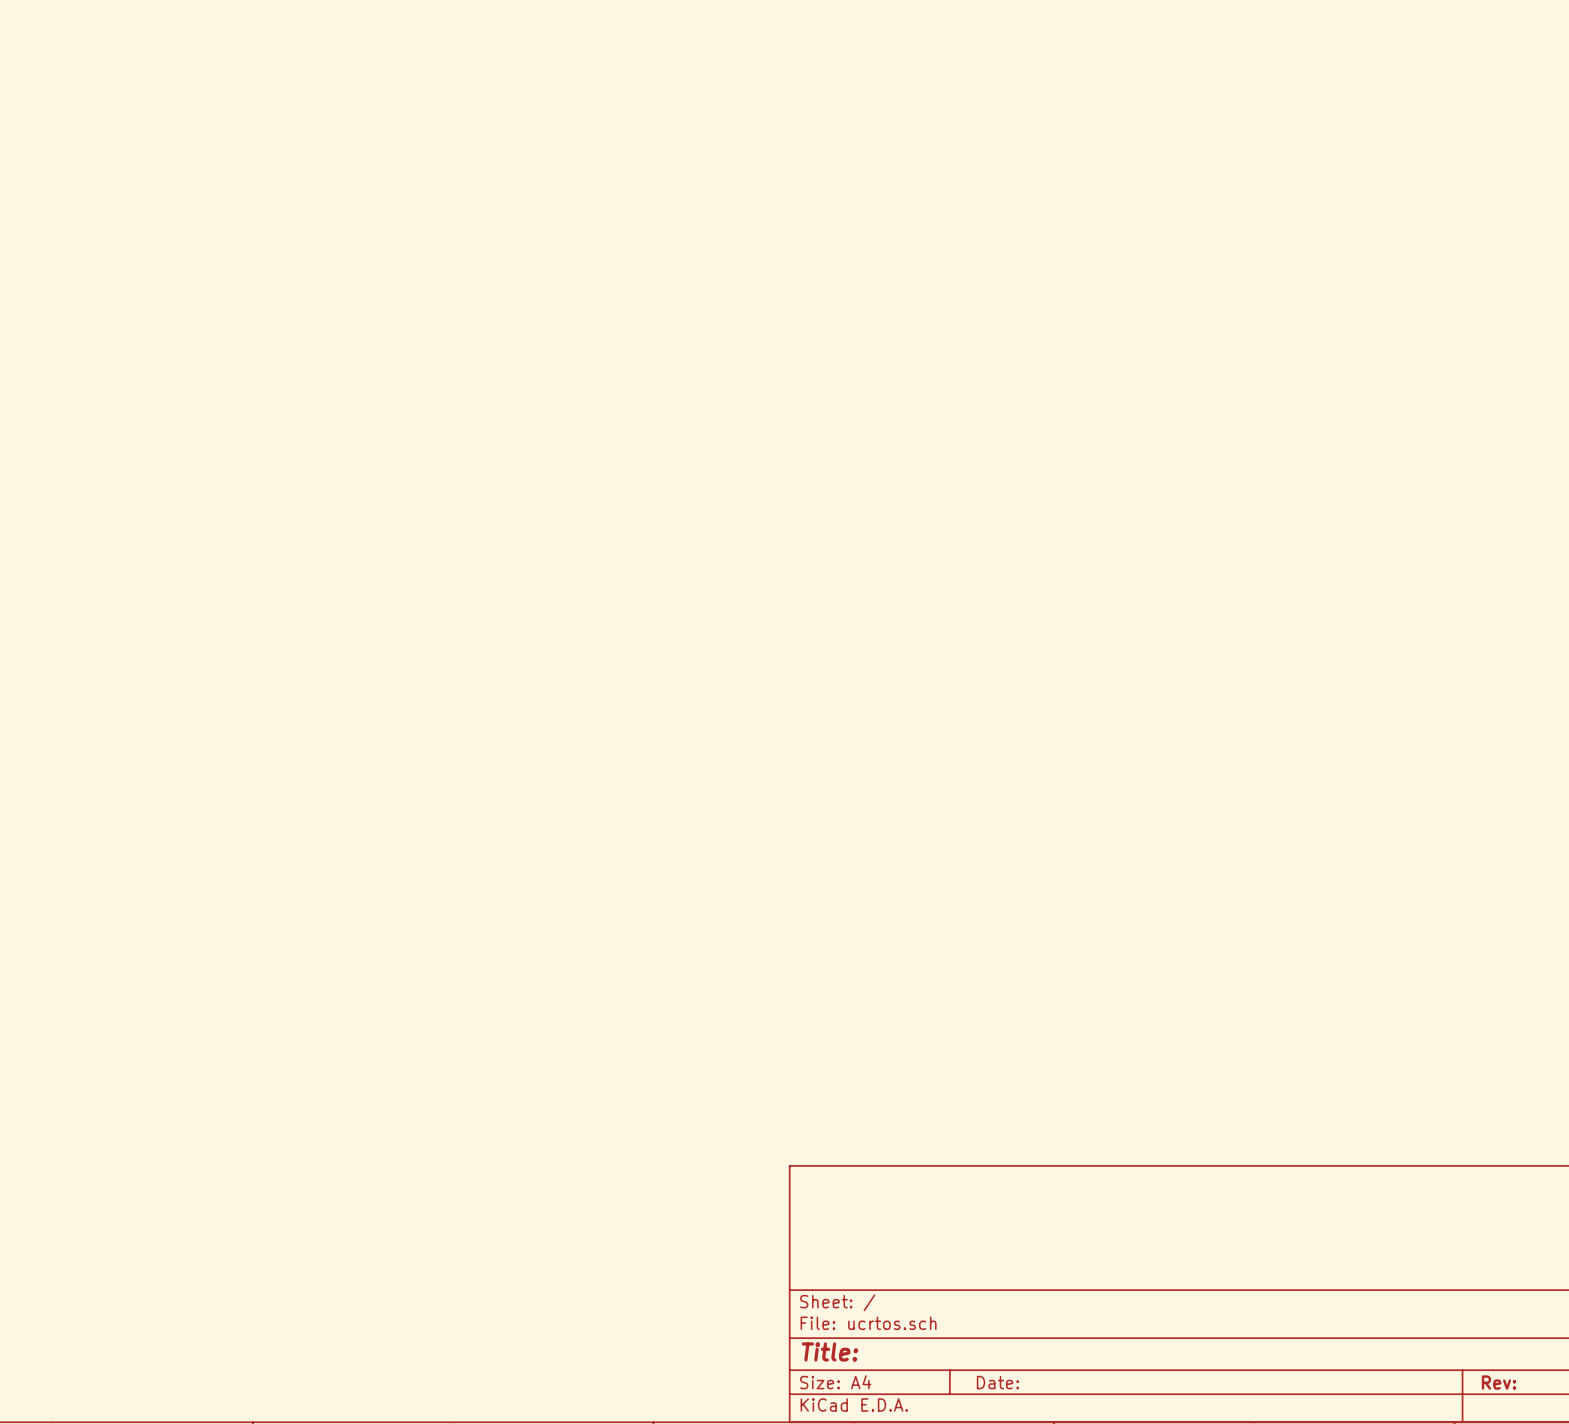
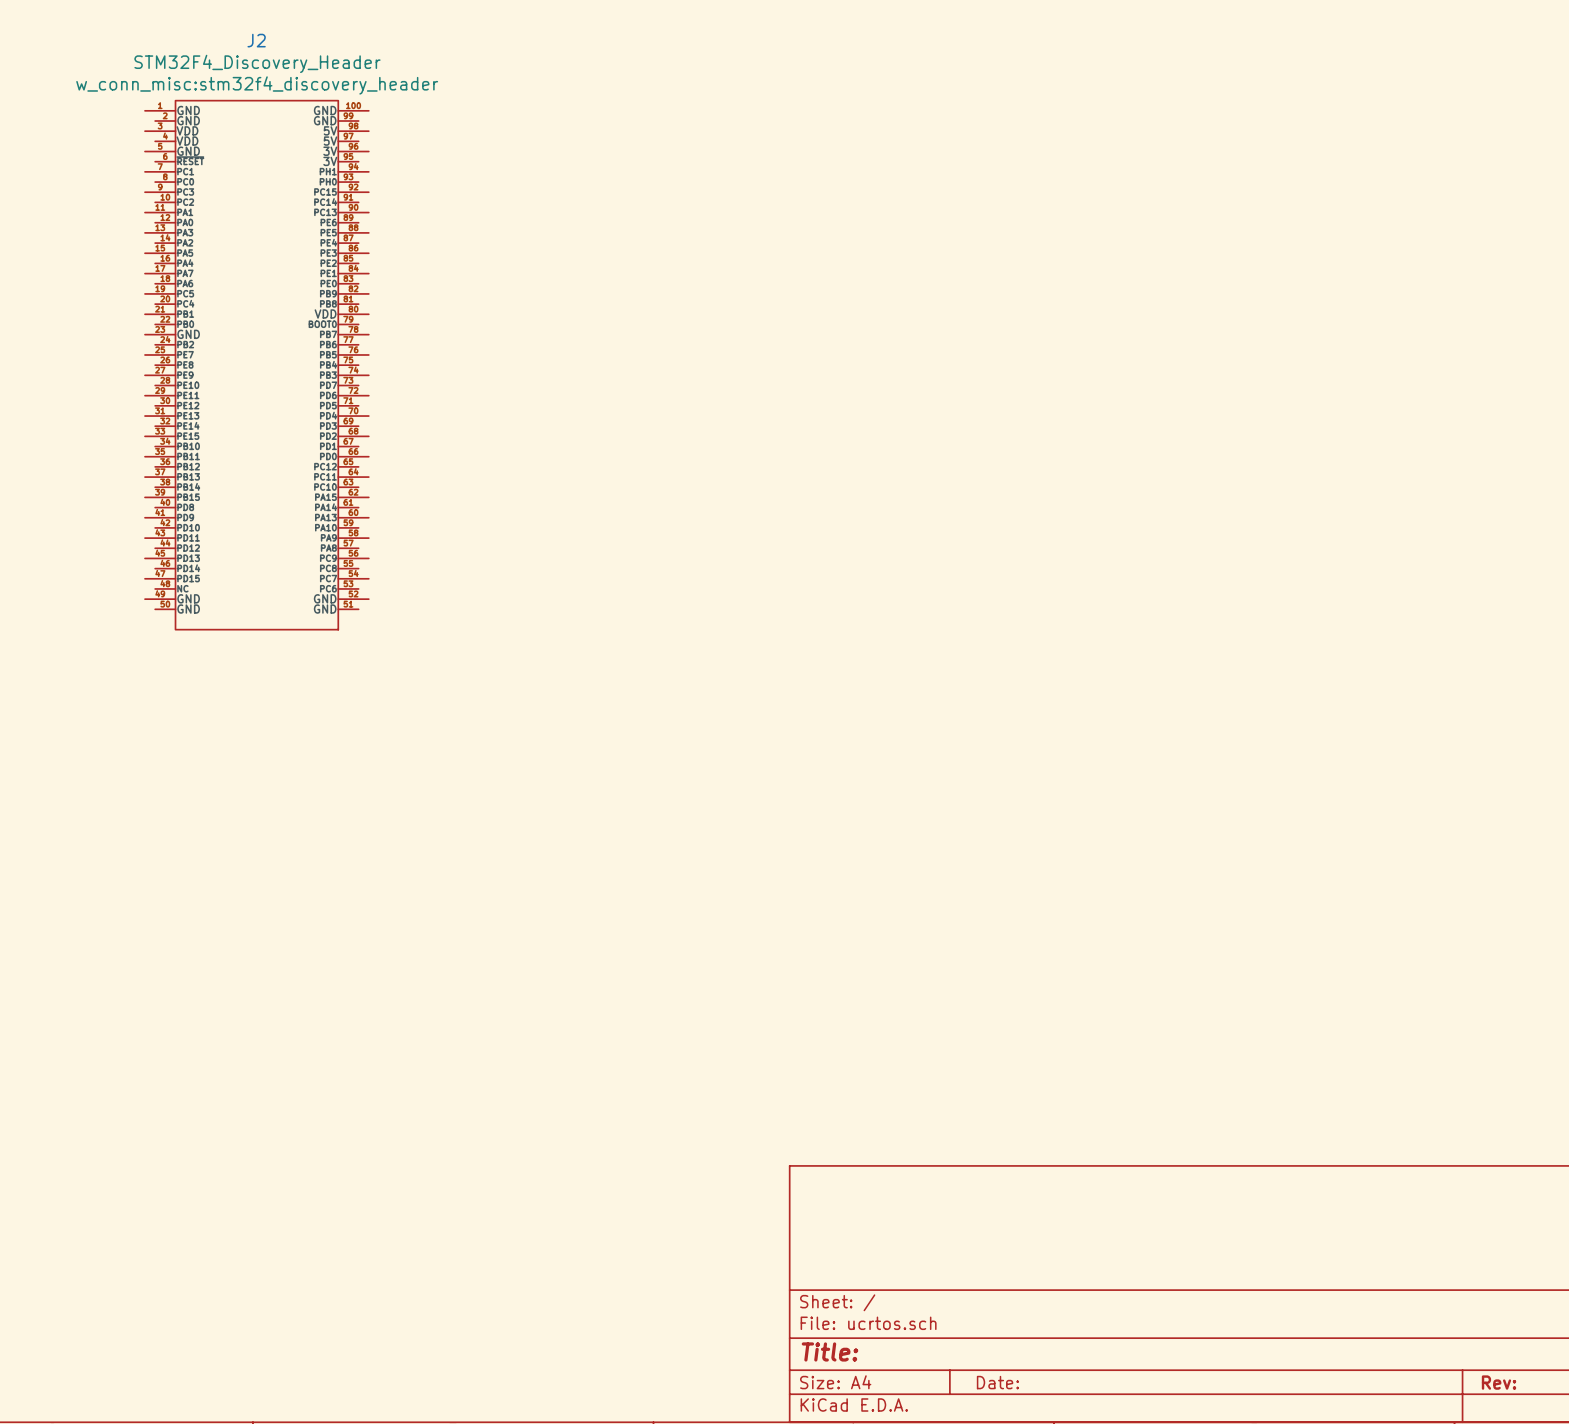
J2: none -> STM32F4_Discovery_Header (256, 365)

